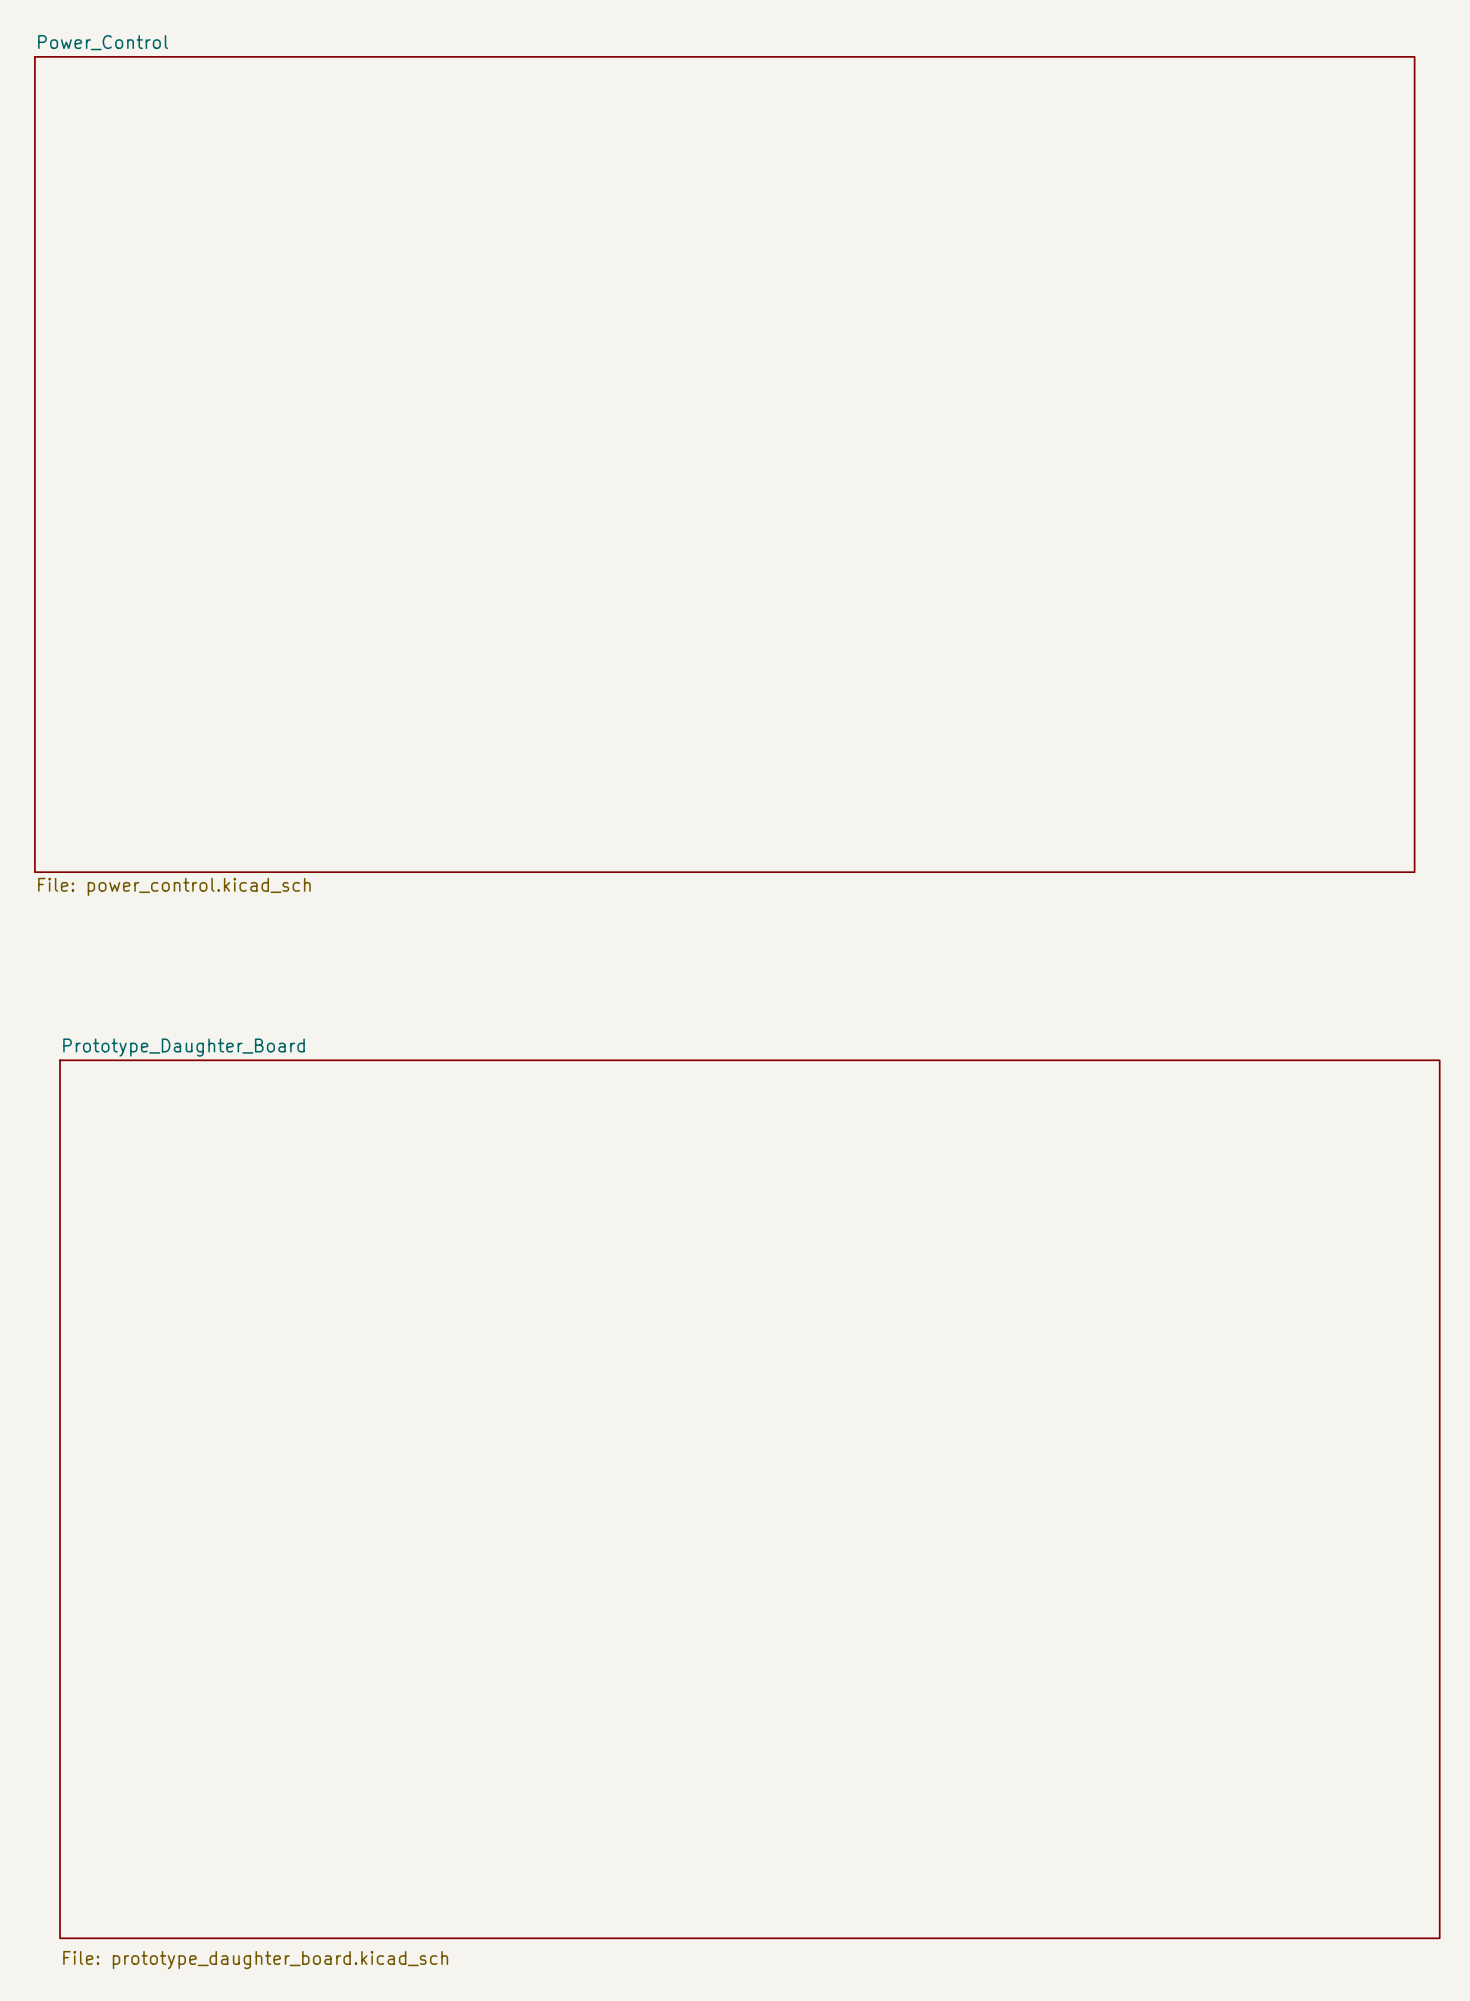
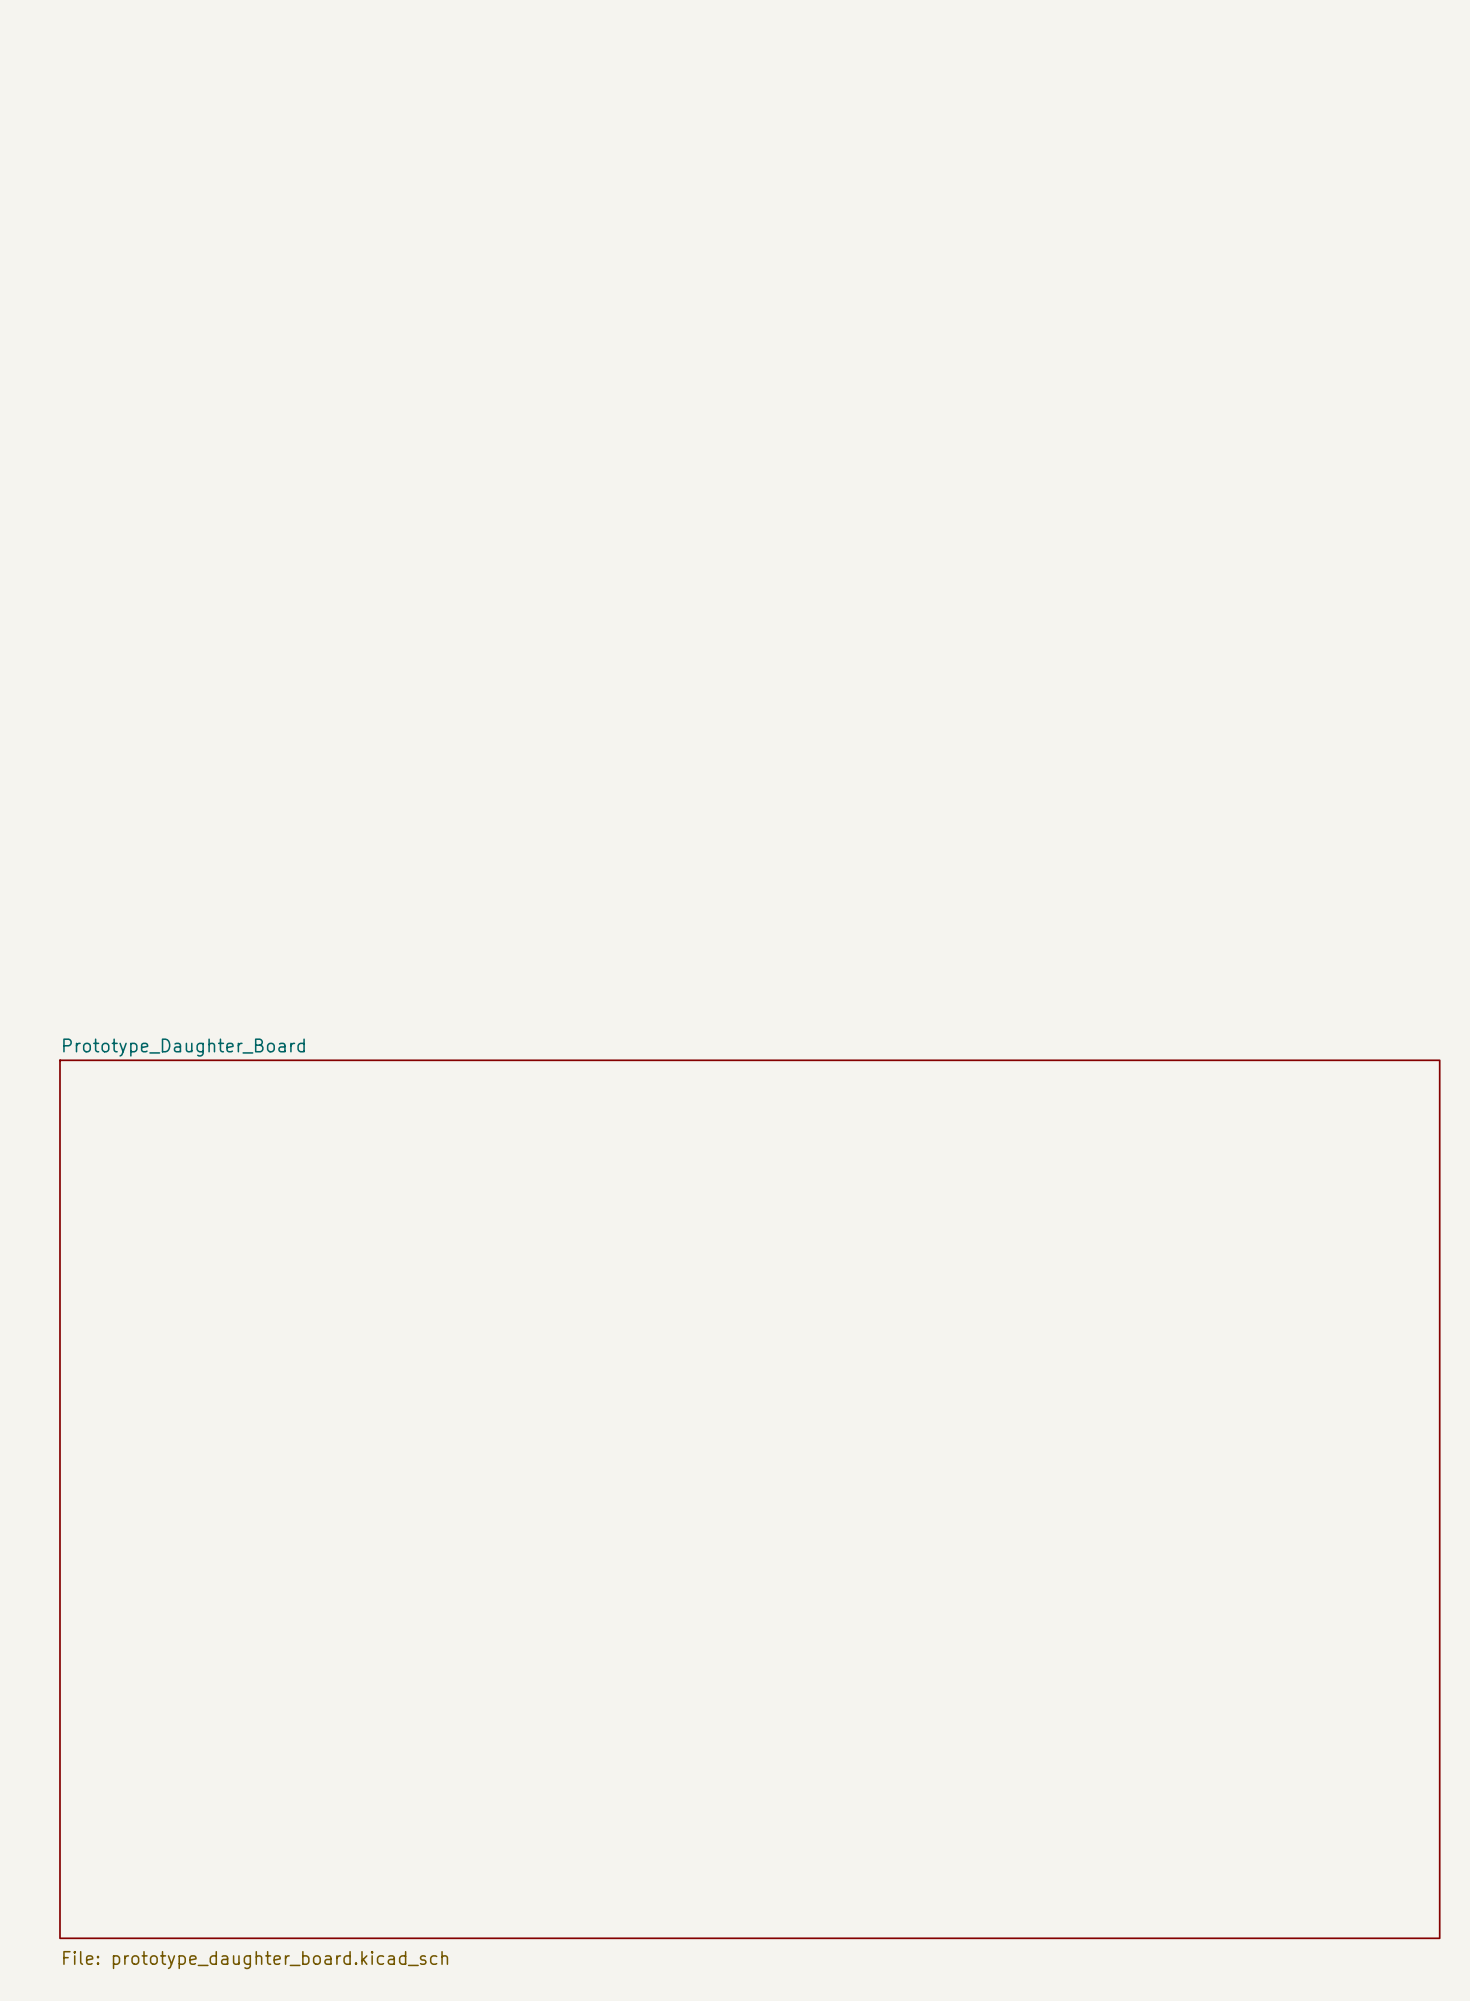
sheet Power_Control: File: power_control.kicad_sch (724, 464) -> none

